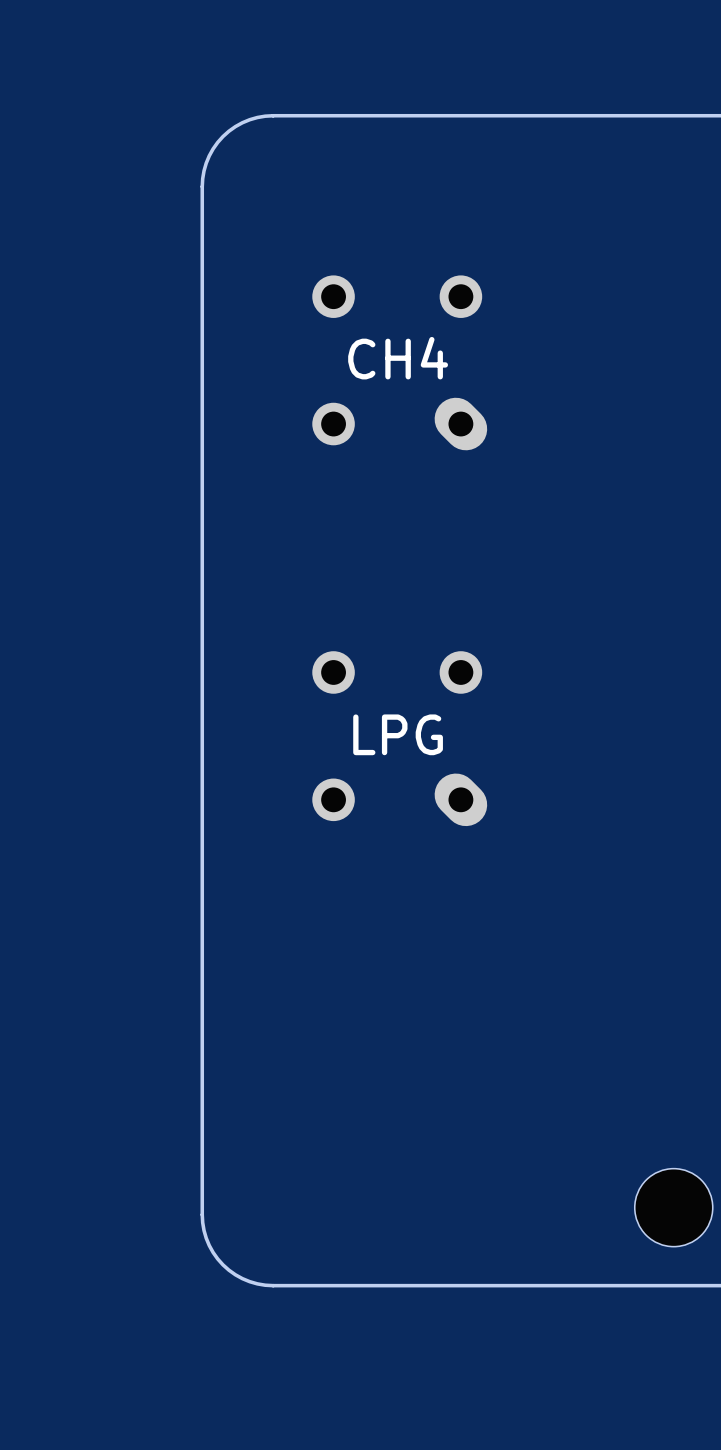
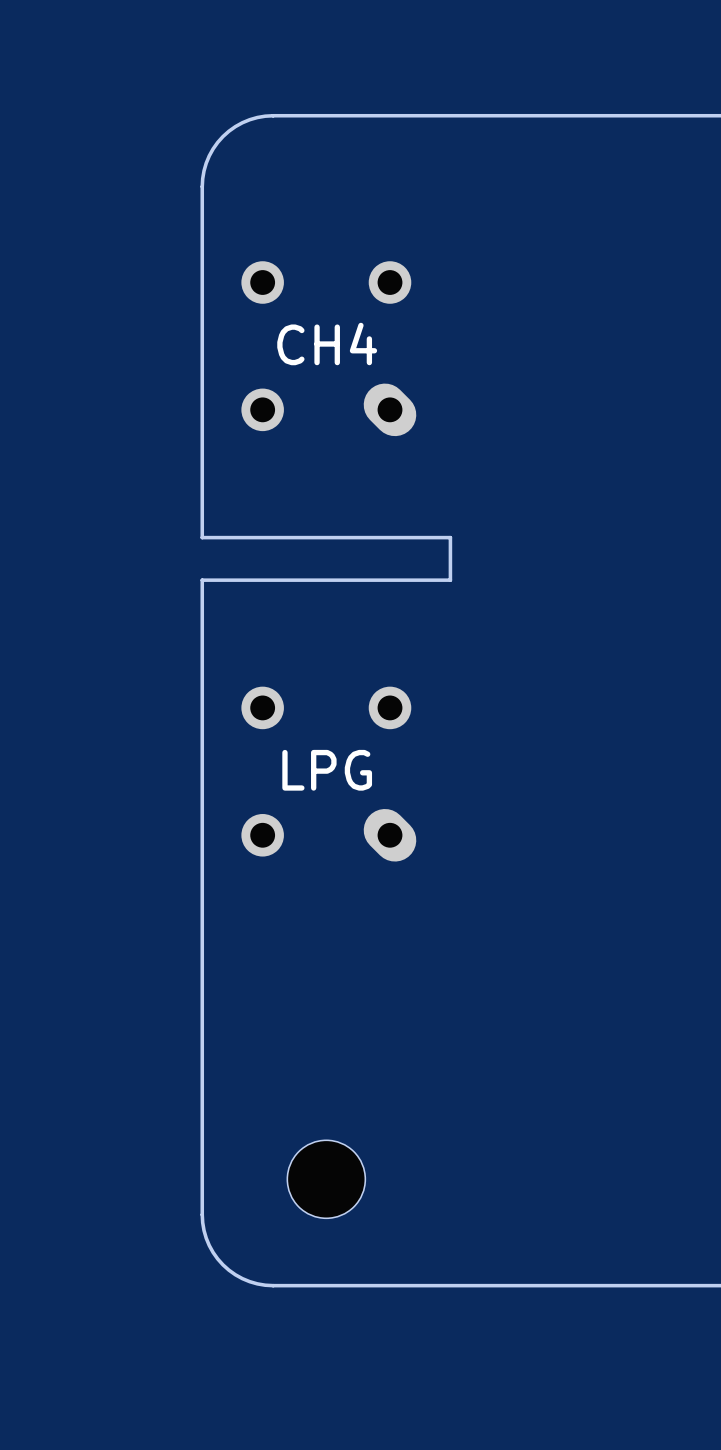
text position: CH4 (398, 358) -> CH4 (327, 344)
part position: (399, 362) -> (328, 348)
board edge: (202, 537) (202, 580) -> (202, 537) (450, 537) (450, 580) (202, 580)
text position: LPG (398, 734) -> LPG (327, 770)
part position: (399, 738) -> (328, 774)
part position: (673, 1207) -> (326, 1179)

